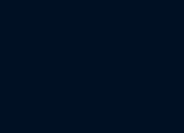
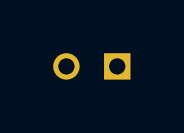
part: none -> (91, 66)

